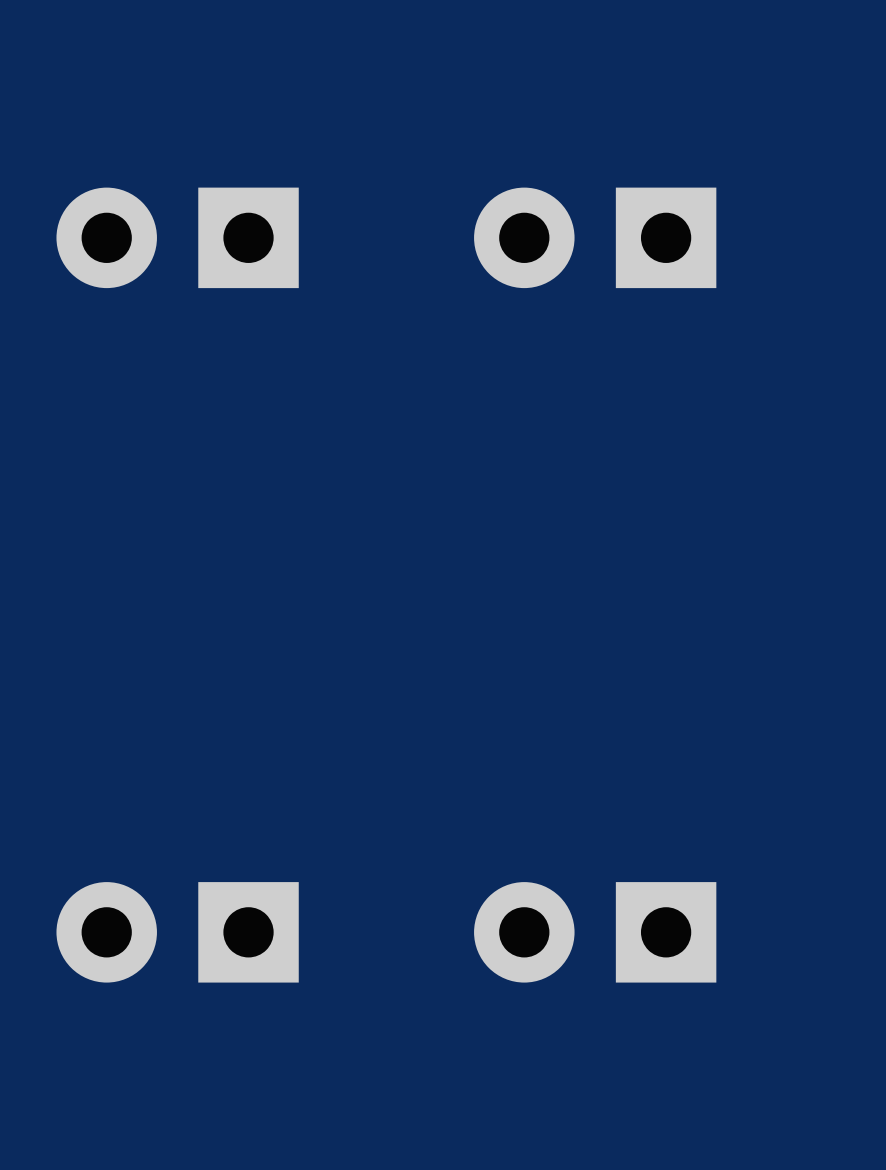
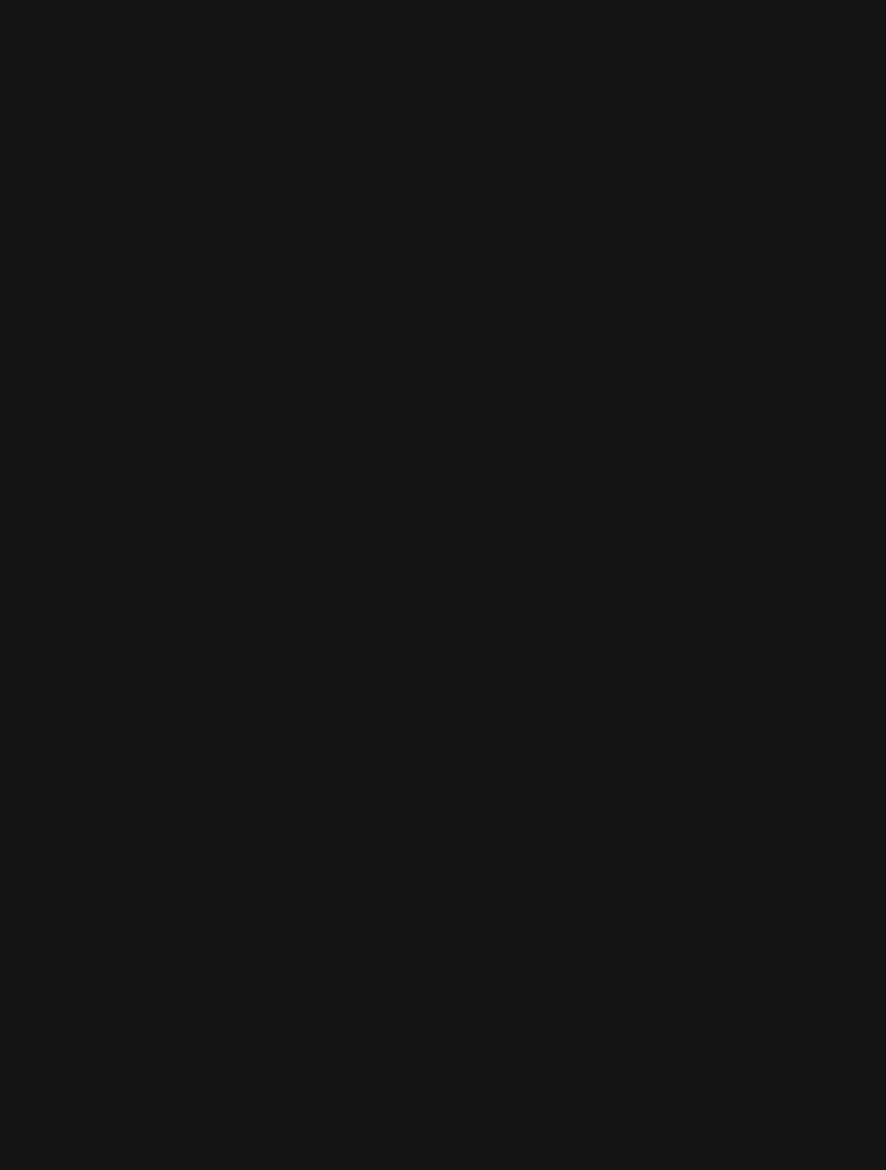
part: (177, 237) -> none
part: (595, 237) -> none
part: (177, 932) -> none
part: (595, 932) -> none

